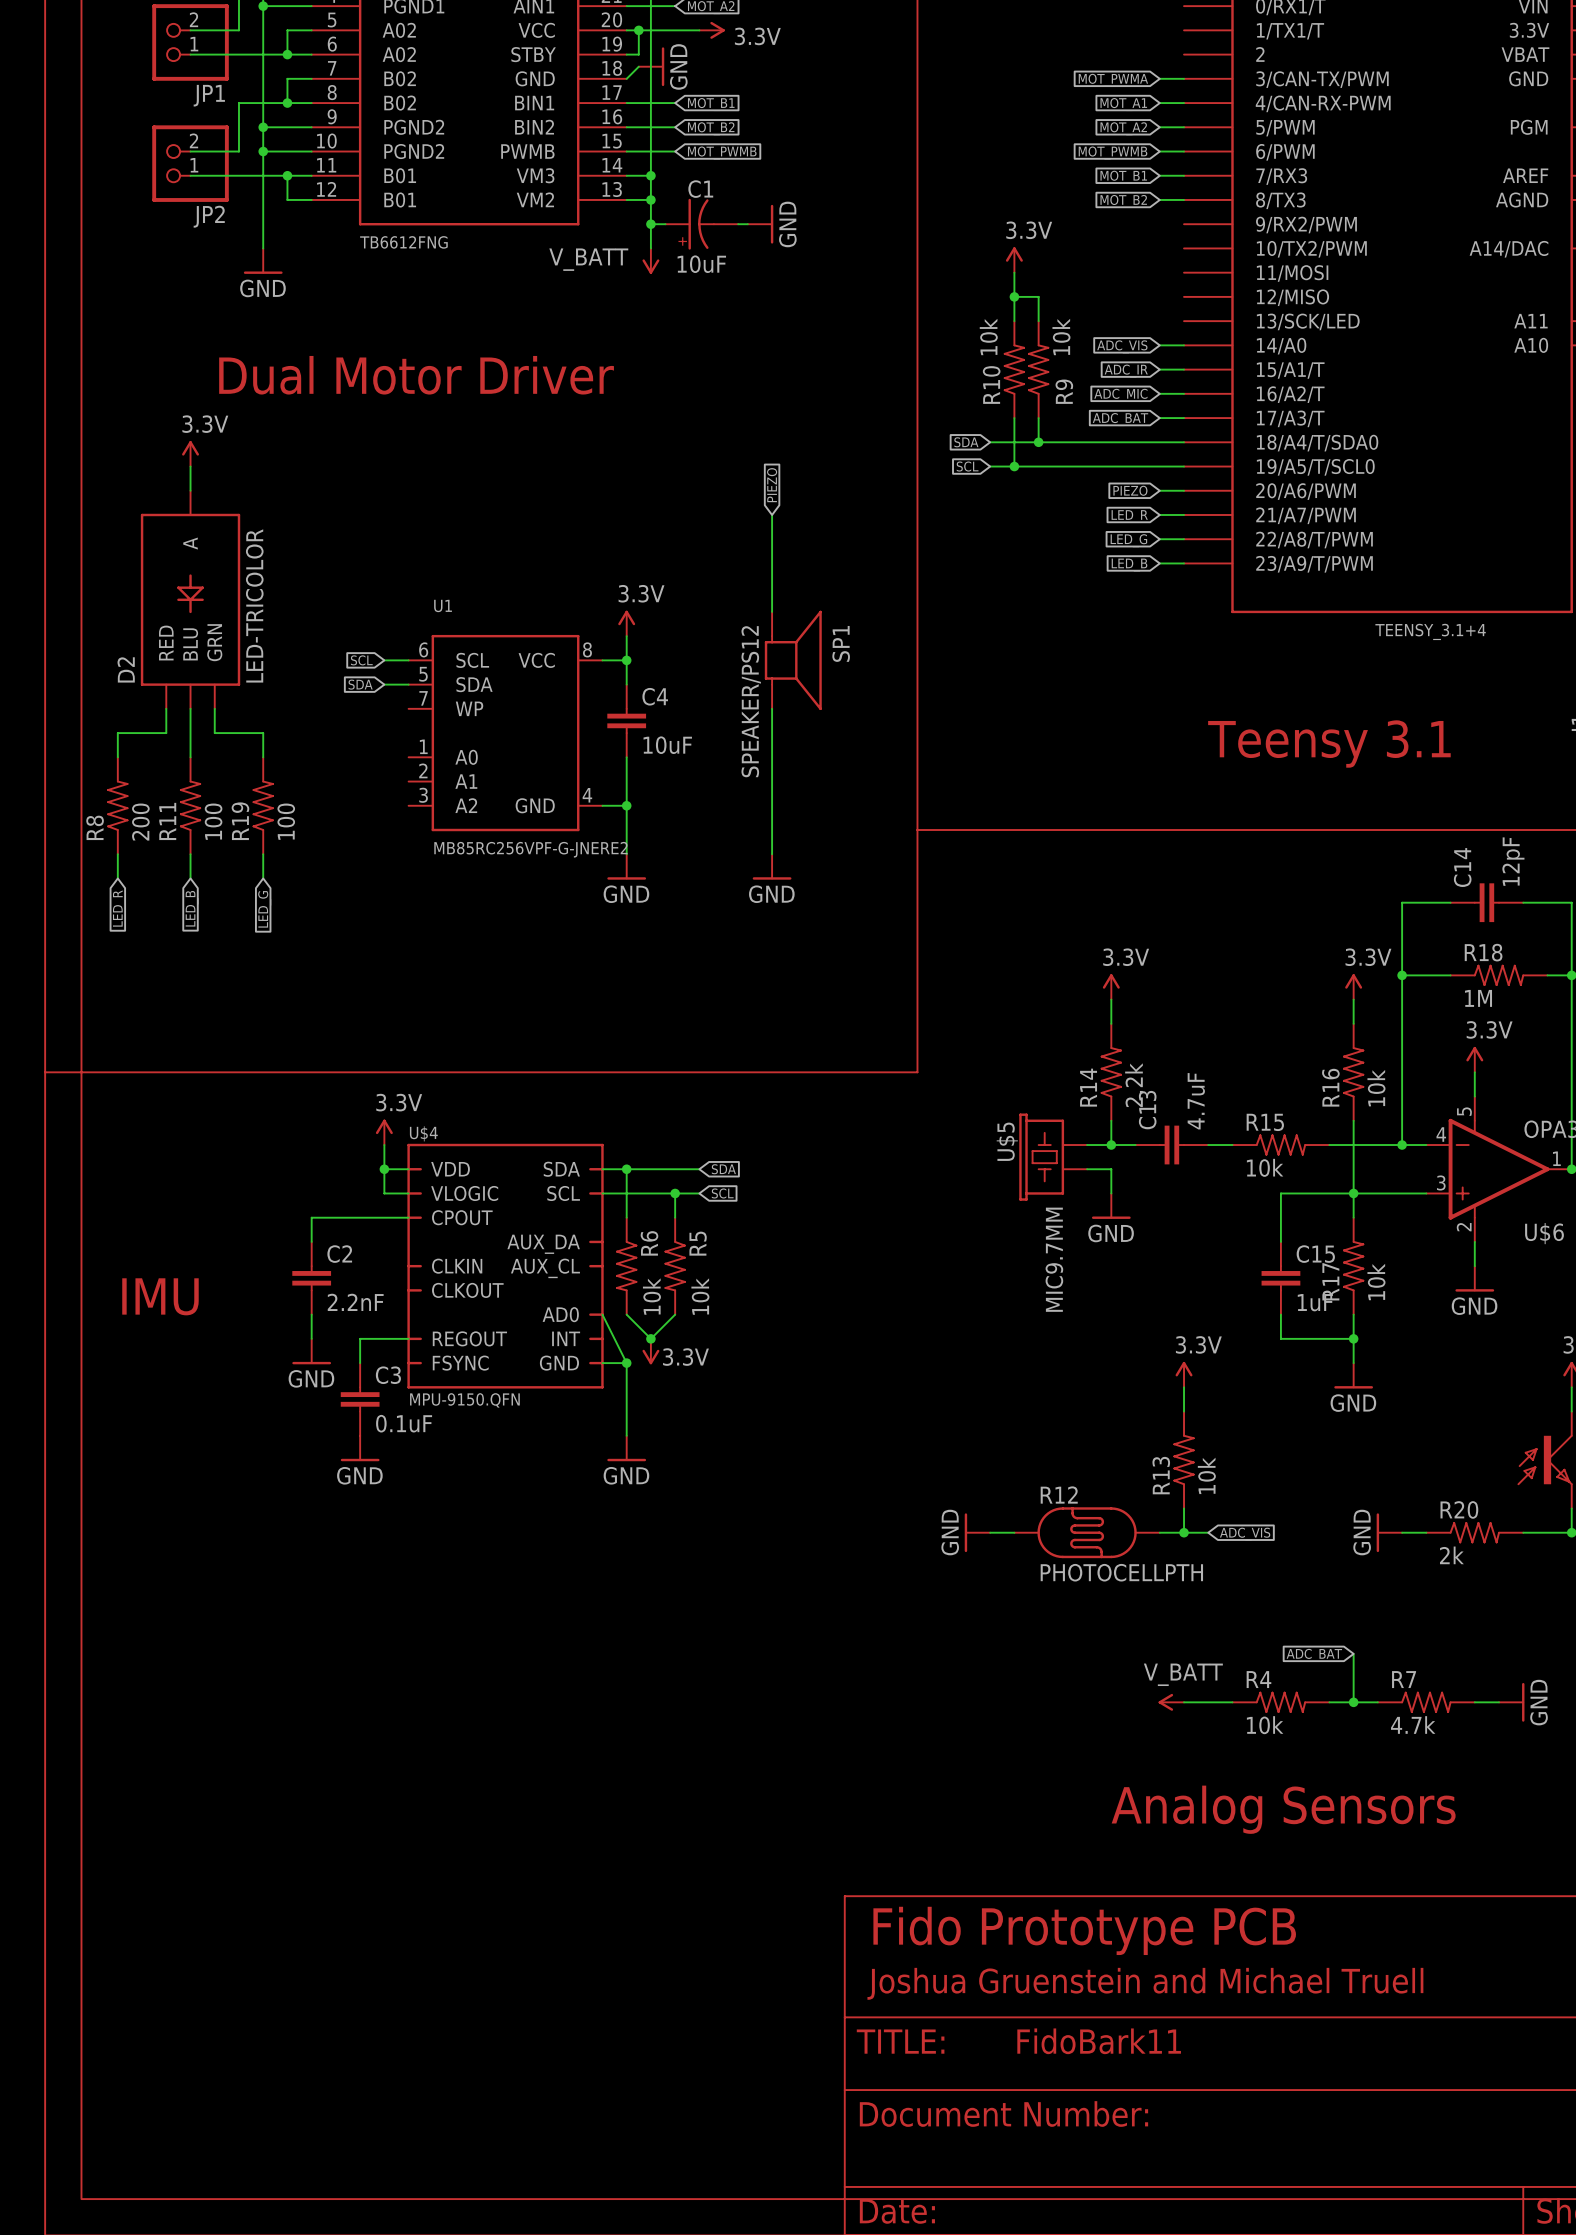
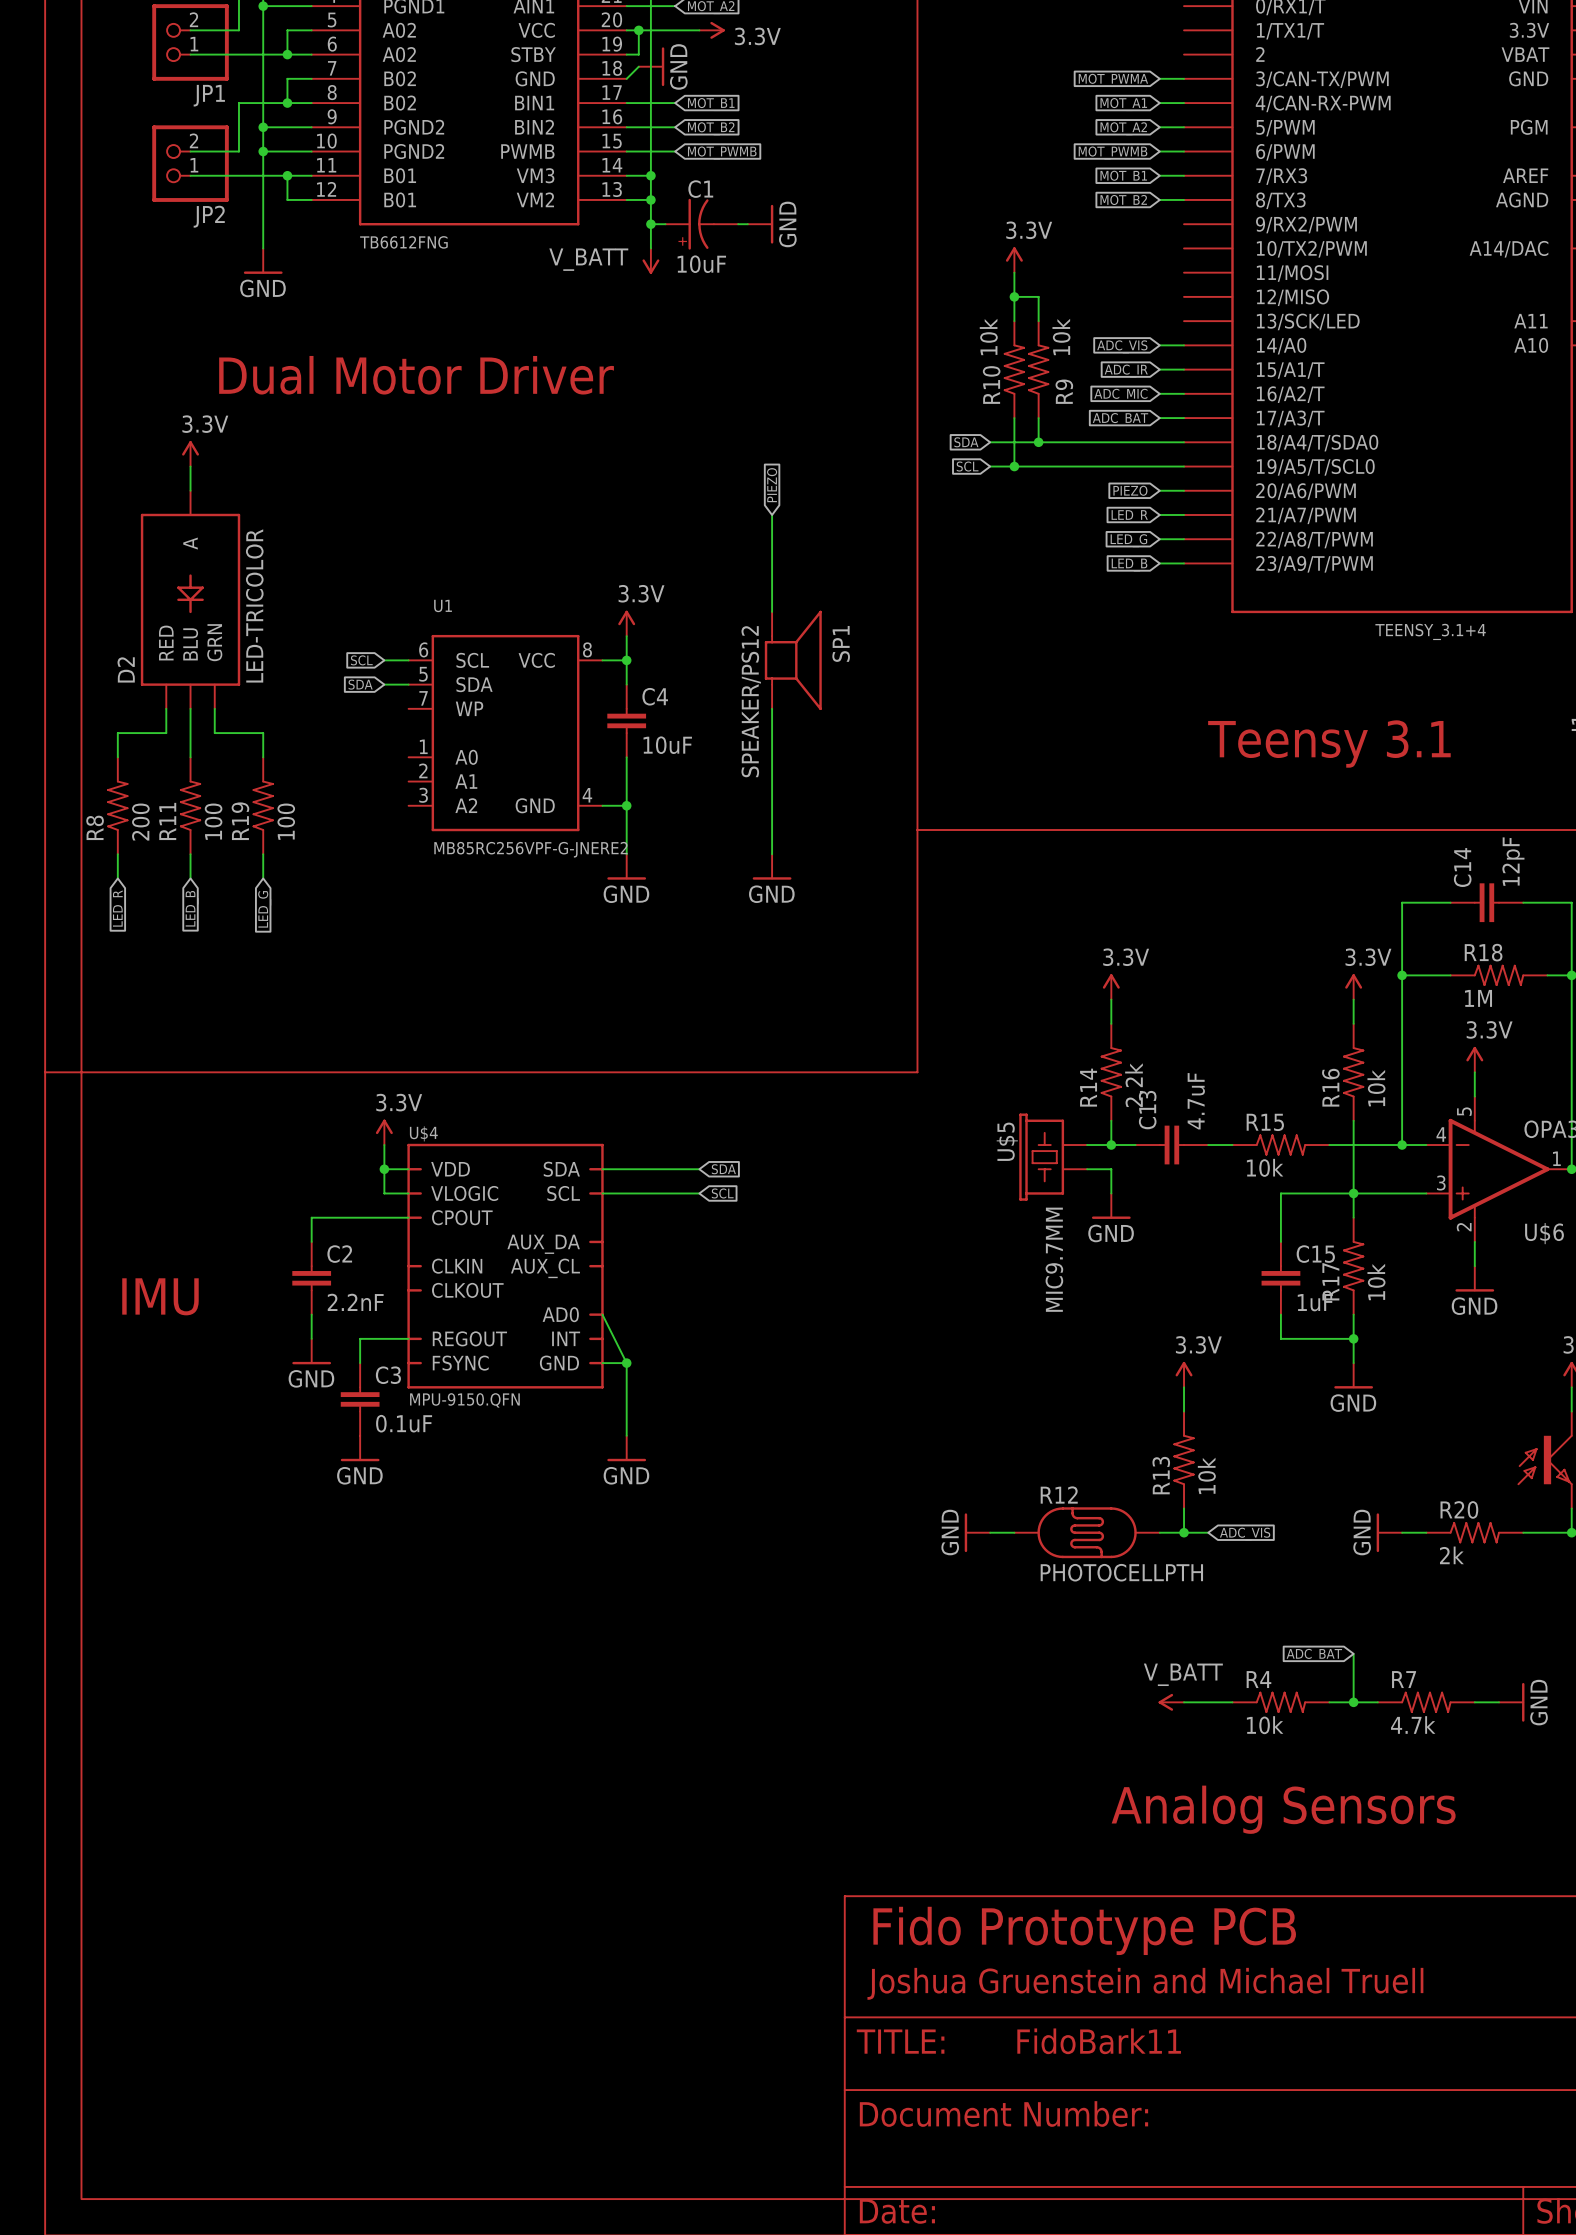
wire: (626, 1169) (626, 1217) -> none
junction: (626, 1169) -> none
wire: (675, 1193) (675, 1217) -> none
junction: (675, 1193) -> none
R6: 10k (626, 1266) -> none
R5: 10k (675, 1266) -> none
wire: (626, 1314) (650, 1338) (675, 1314) -> none
junction: (650, 1338) -> none
power symbol: 3.3V (650, 1351) -> none

